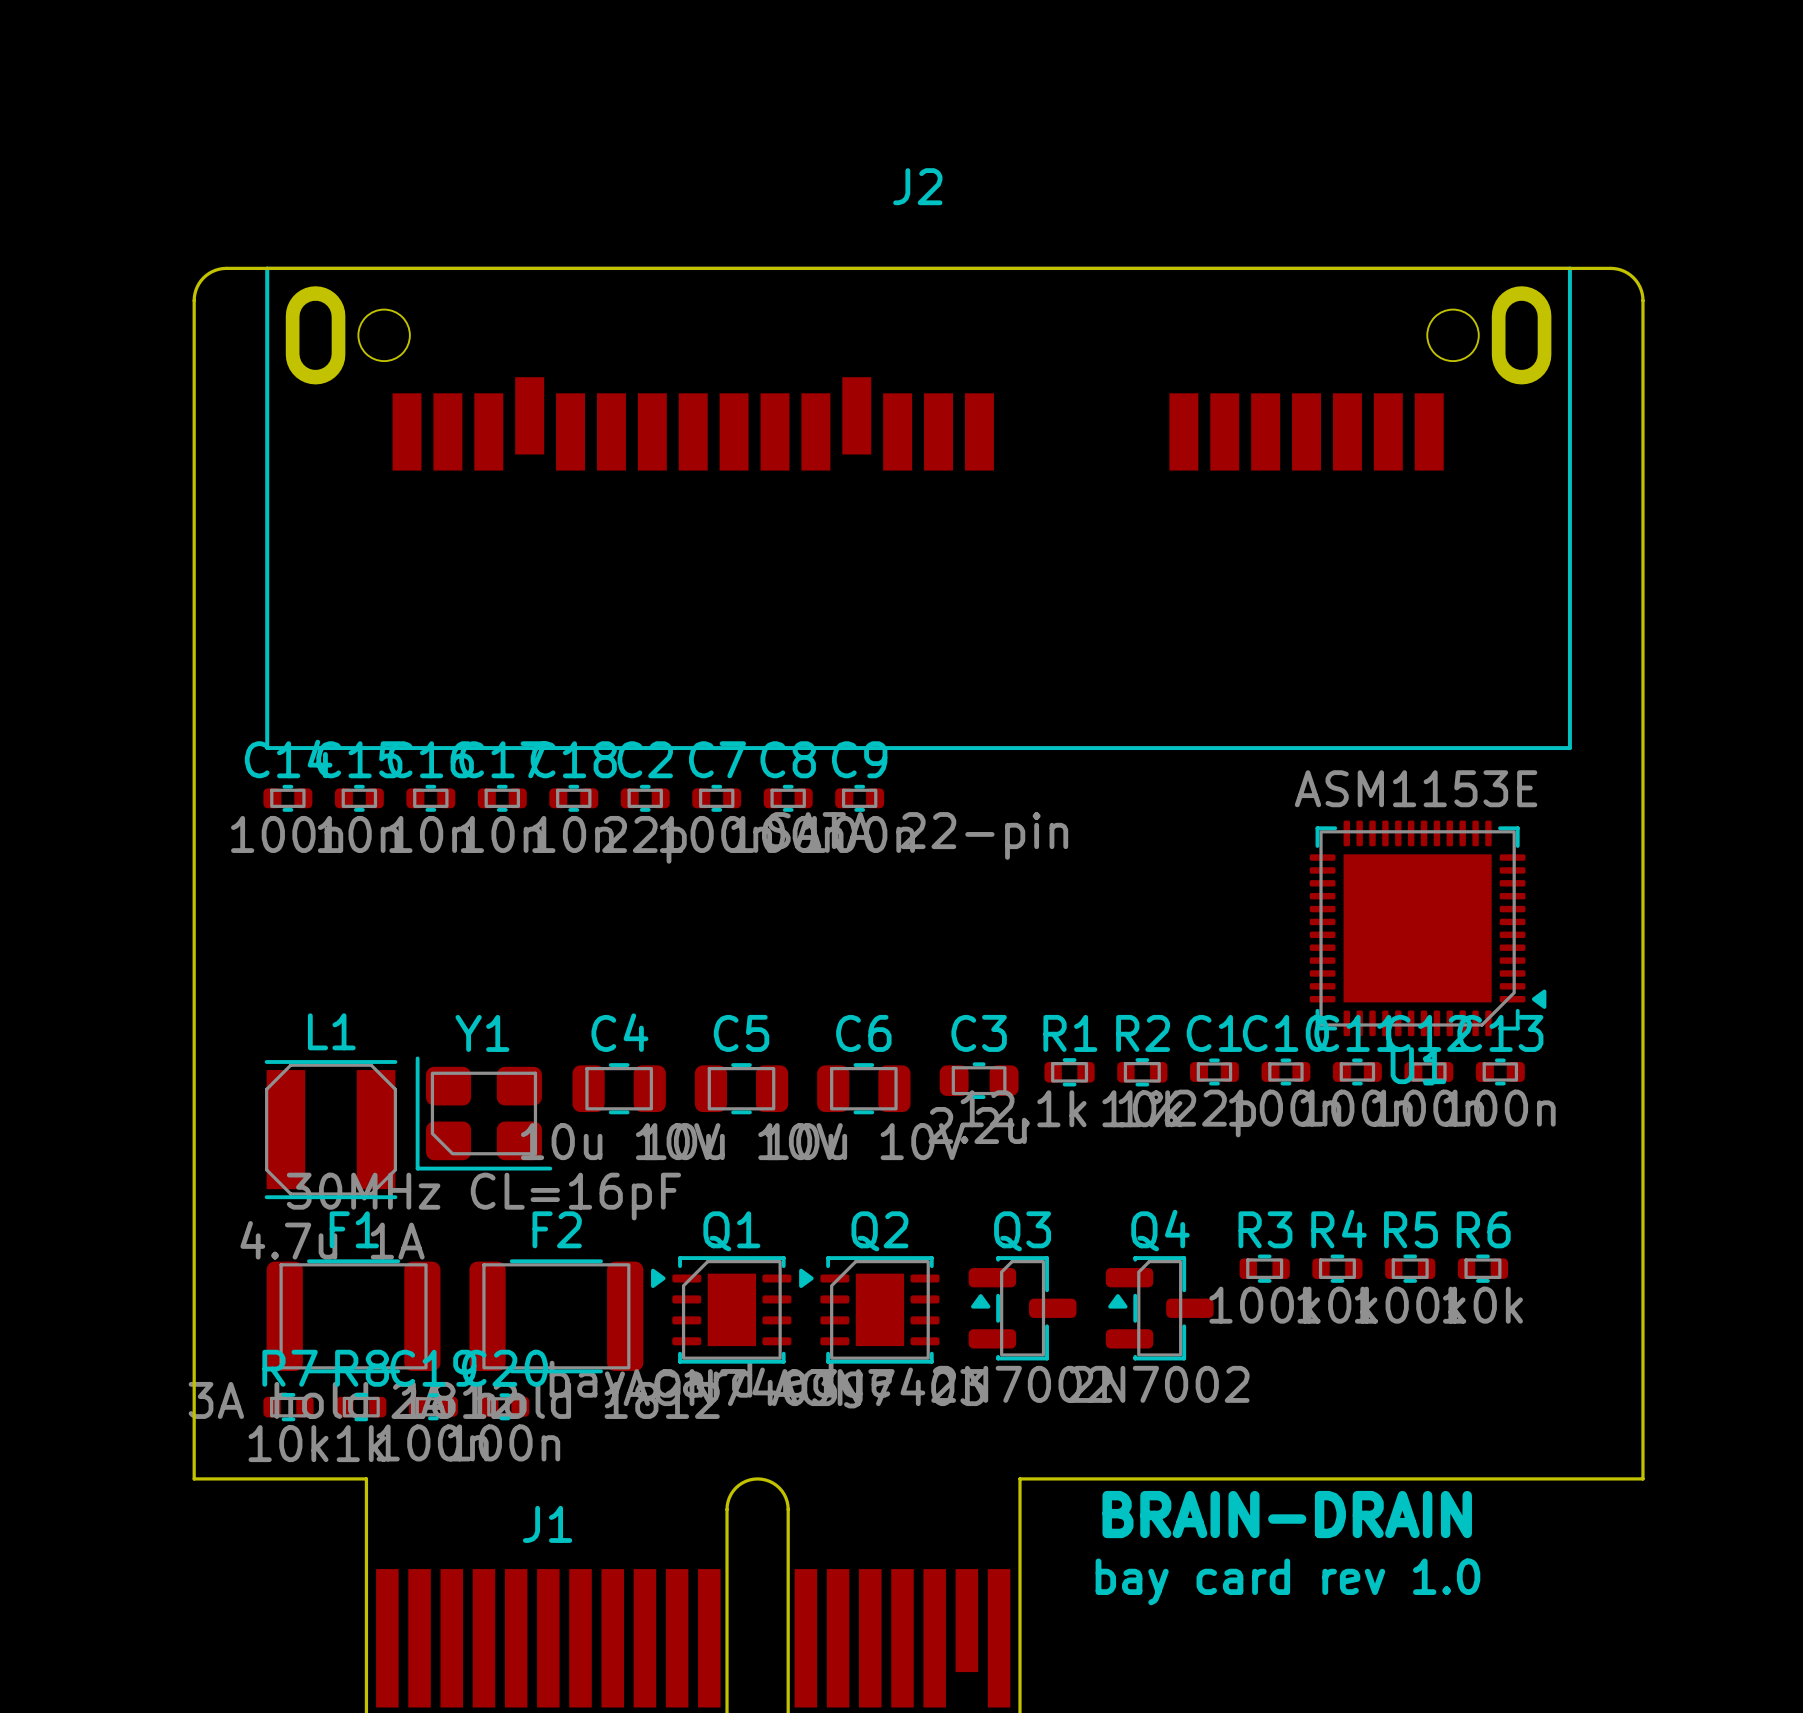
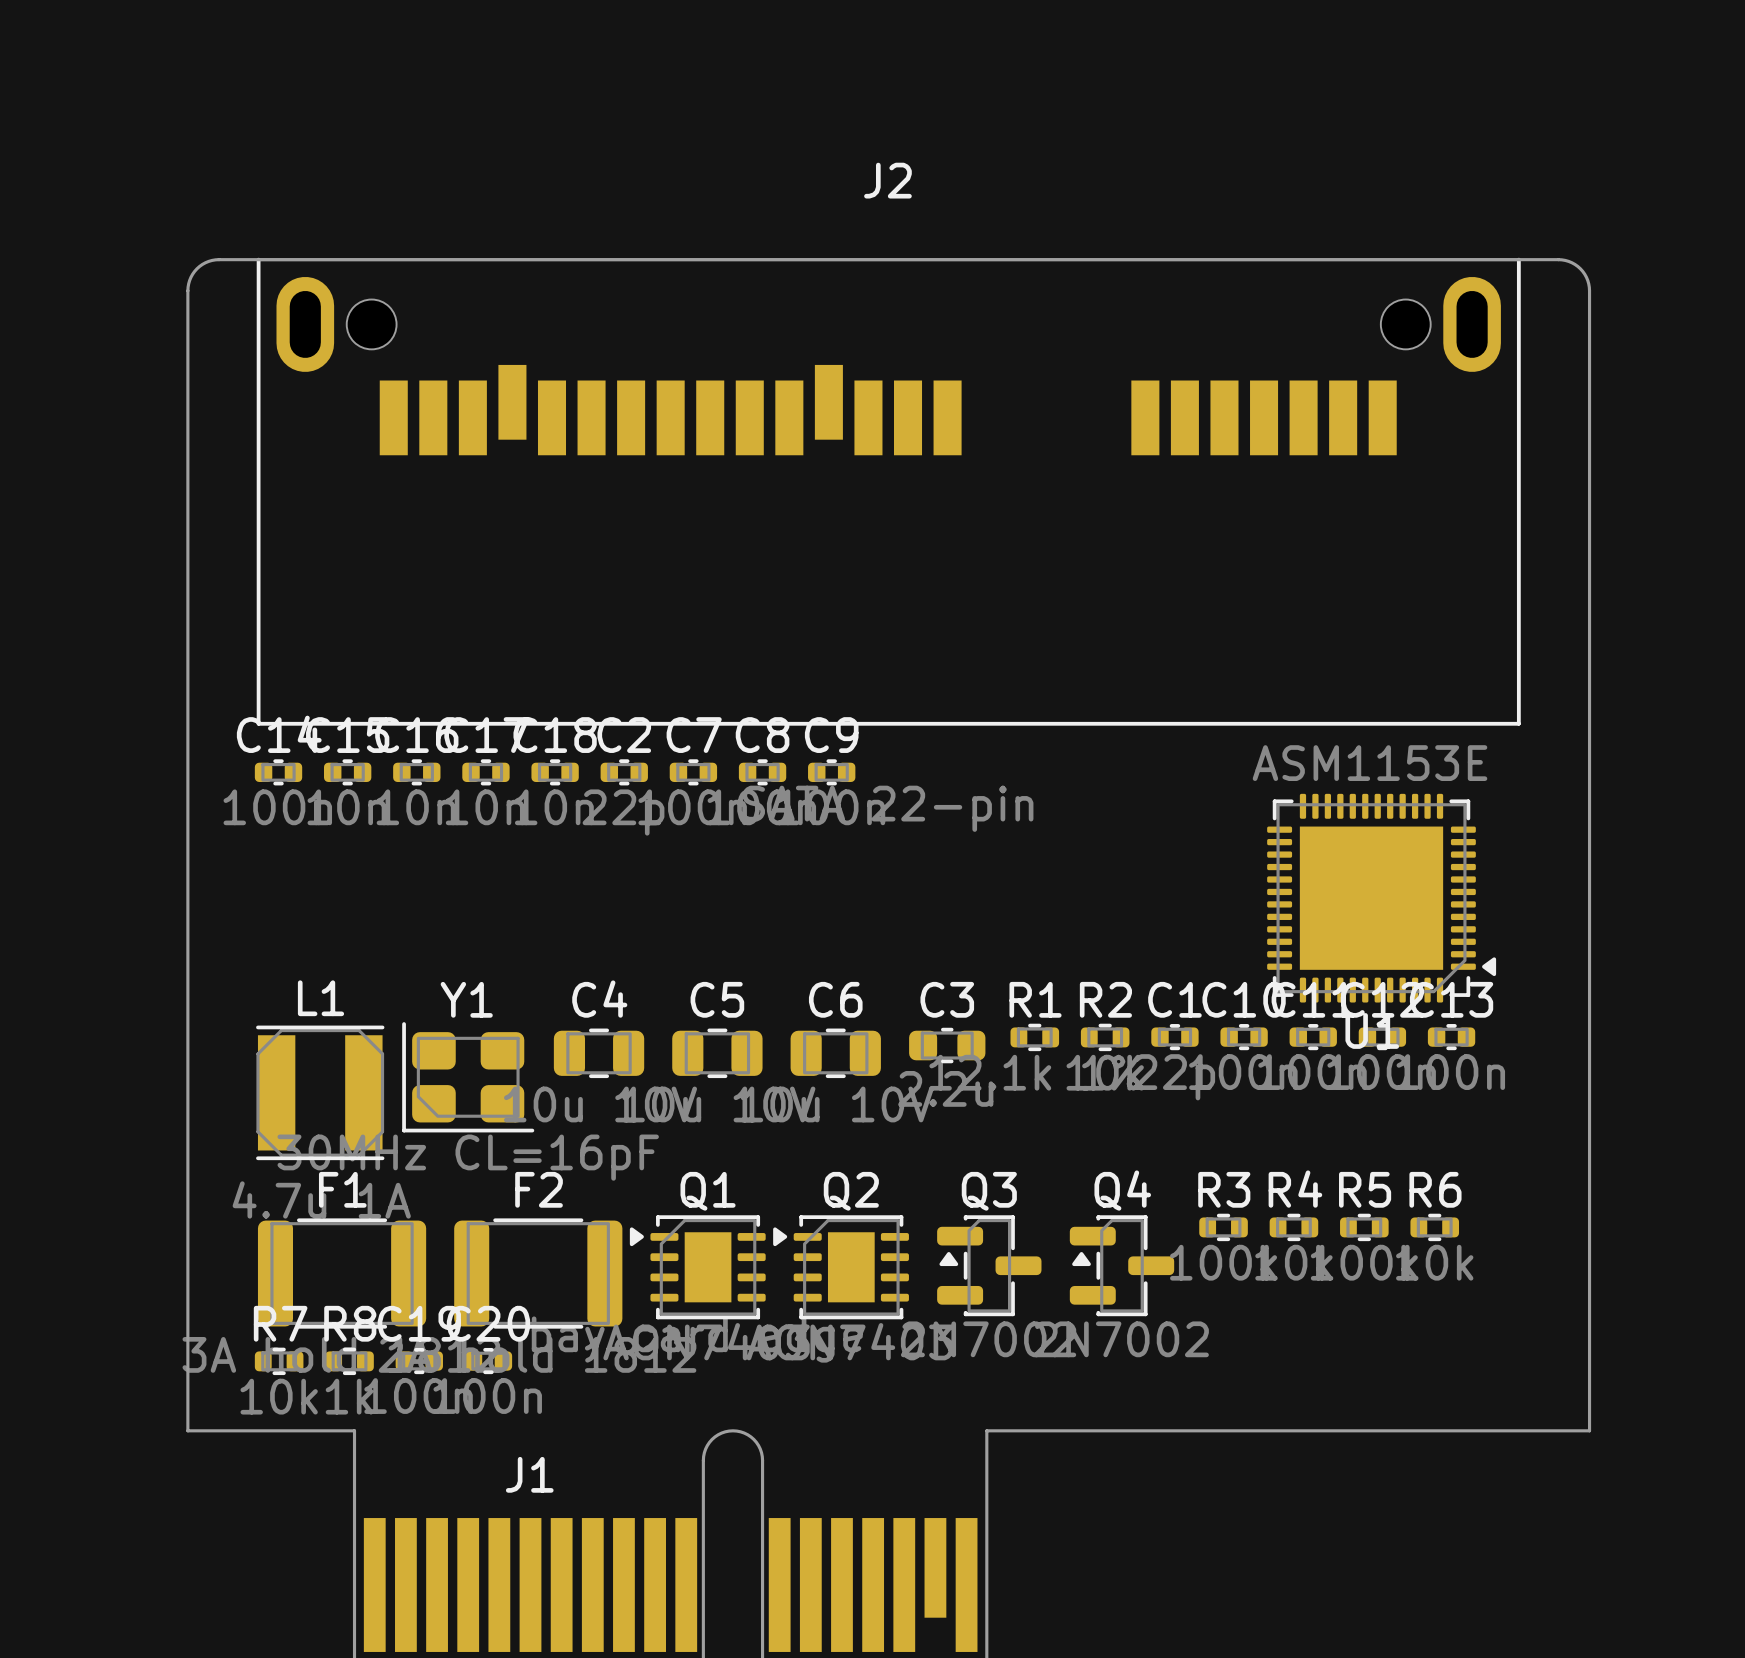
text: BRAIN-DRAIN (1287, 1514) -> none
text: bay card rev 1.0 (1287, 1581) -> none

